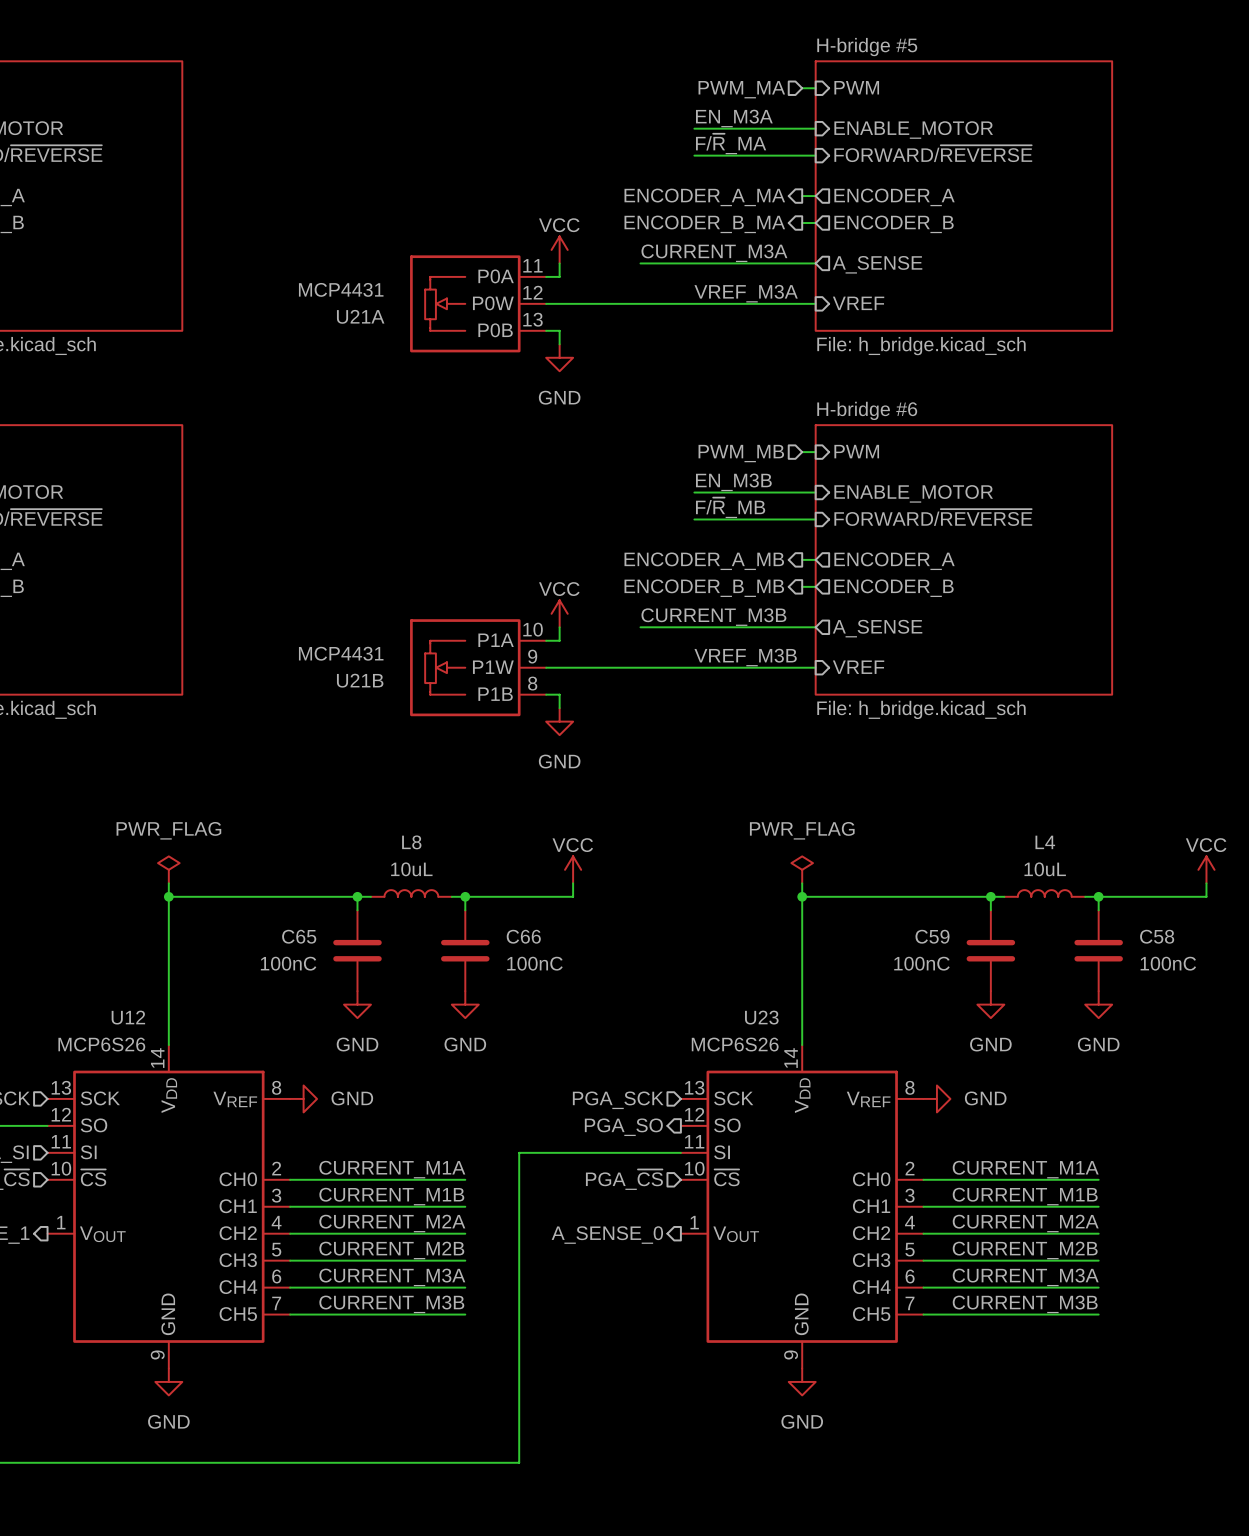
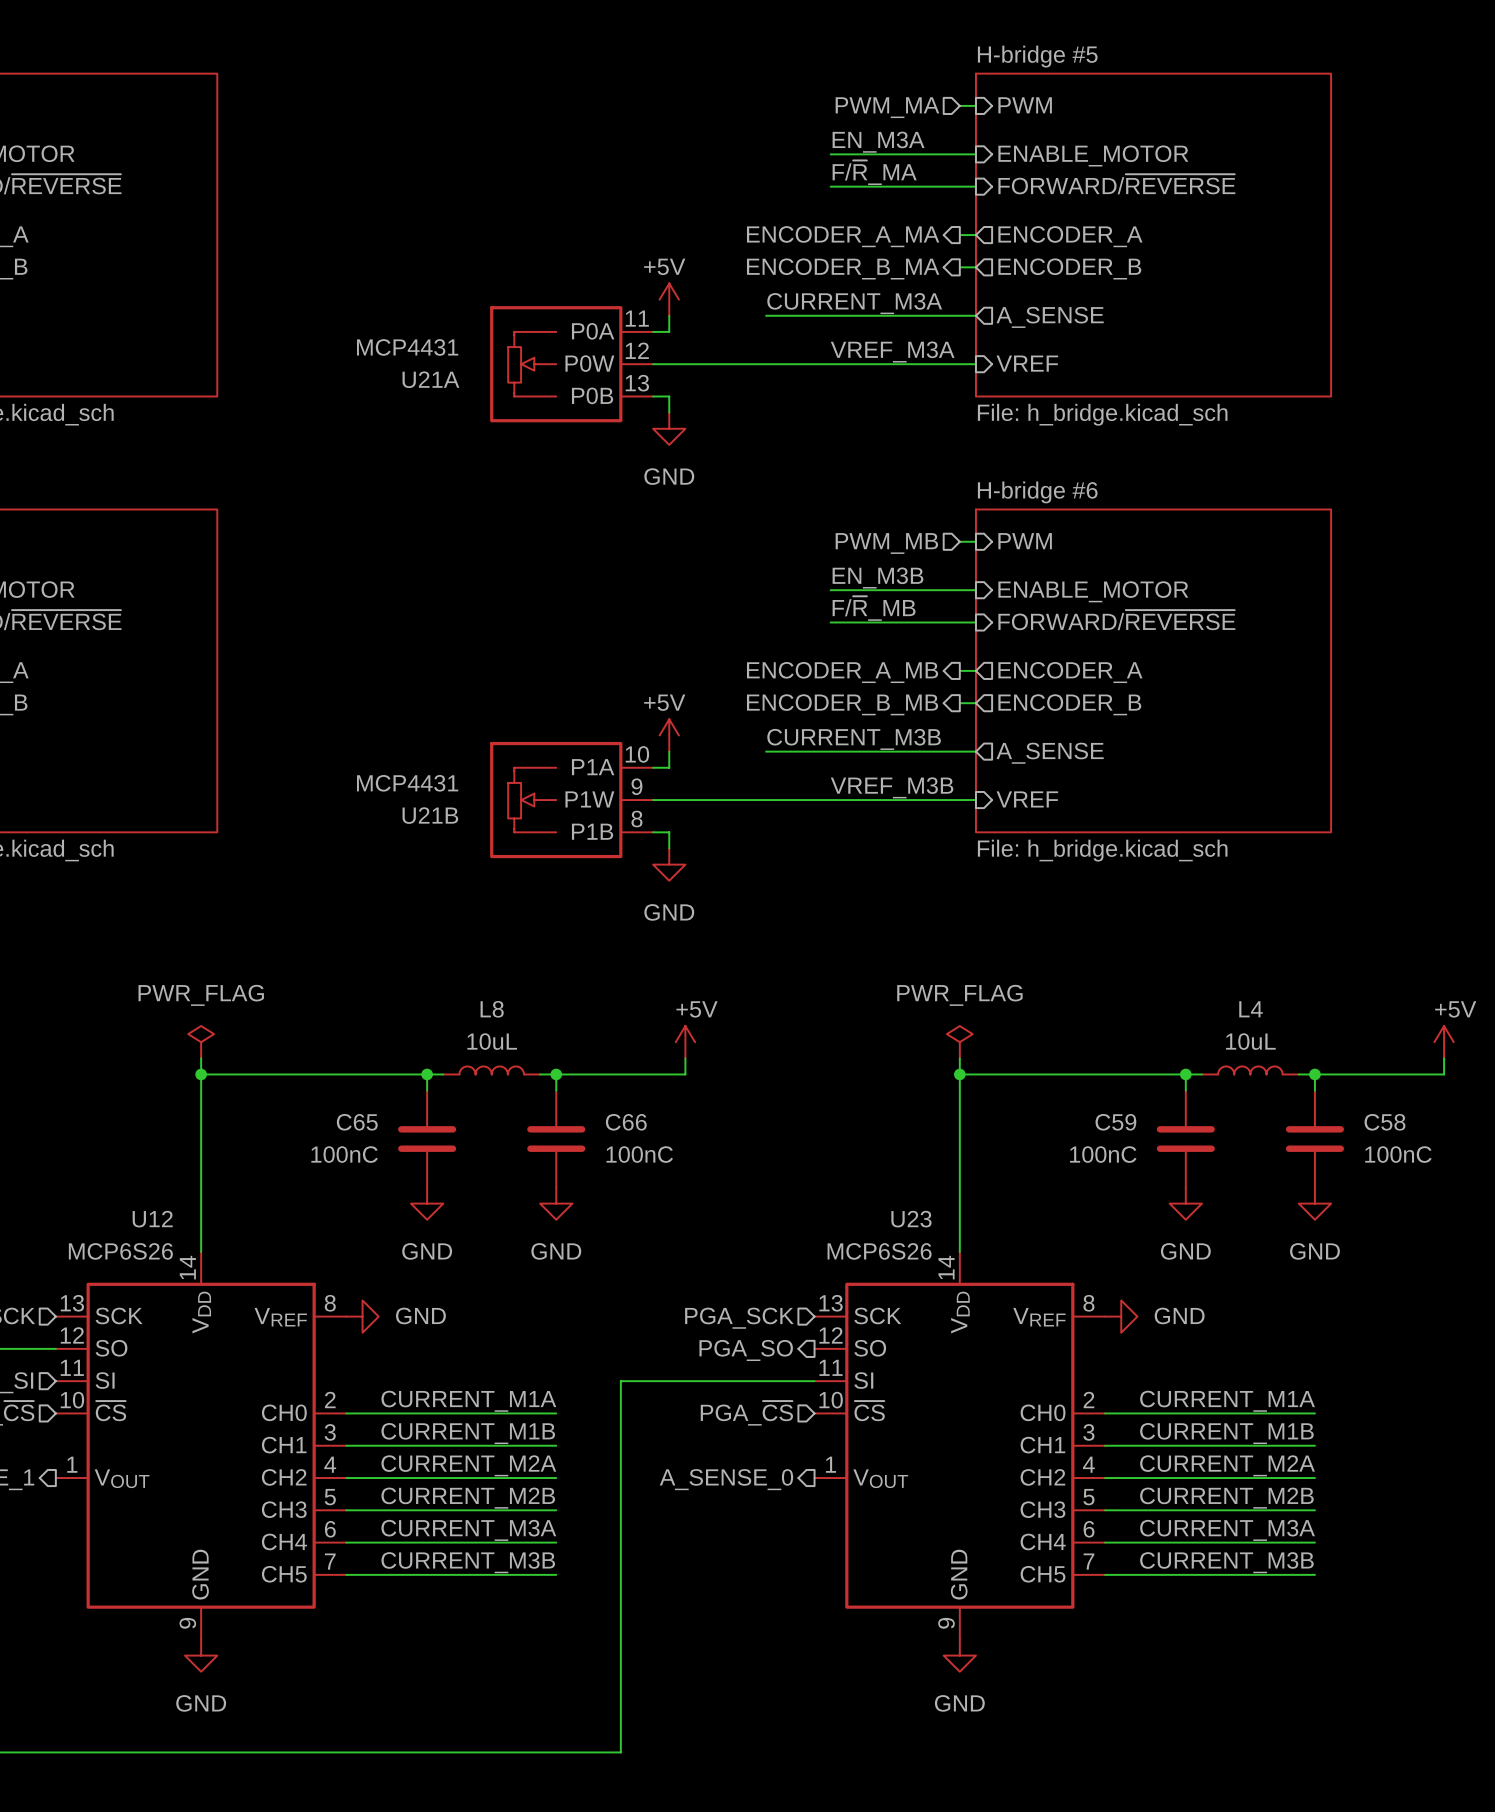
power symbol: VCC (559, 249) -> +5V (669, 299)
power symbol: VCC (559, 613) -> +5V (669, 735)
power symbol: VCC (573, 869) -> +5V (685, 1042)
power symbol: VCC (1206, 869) -> +5V (1444, 1042)

